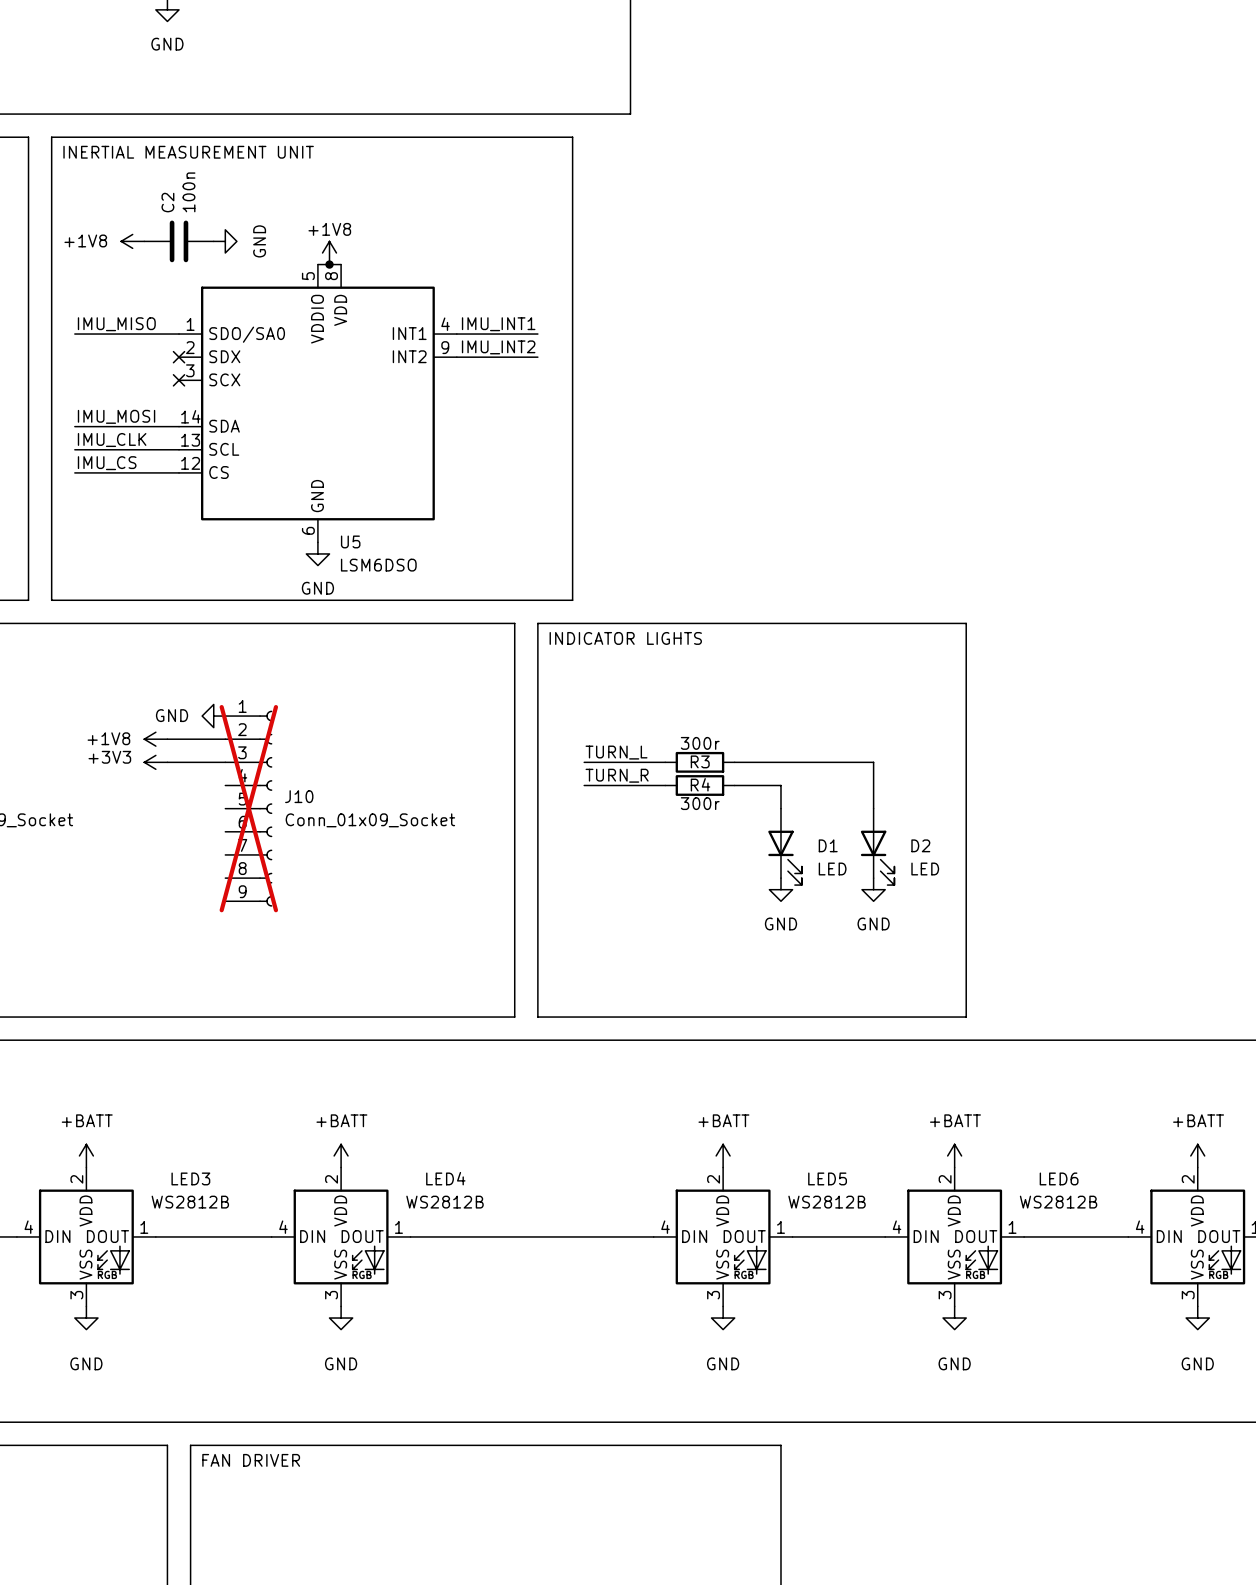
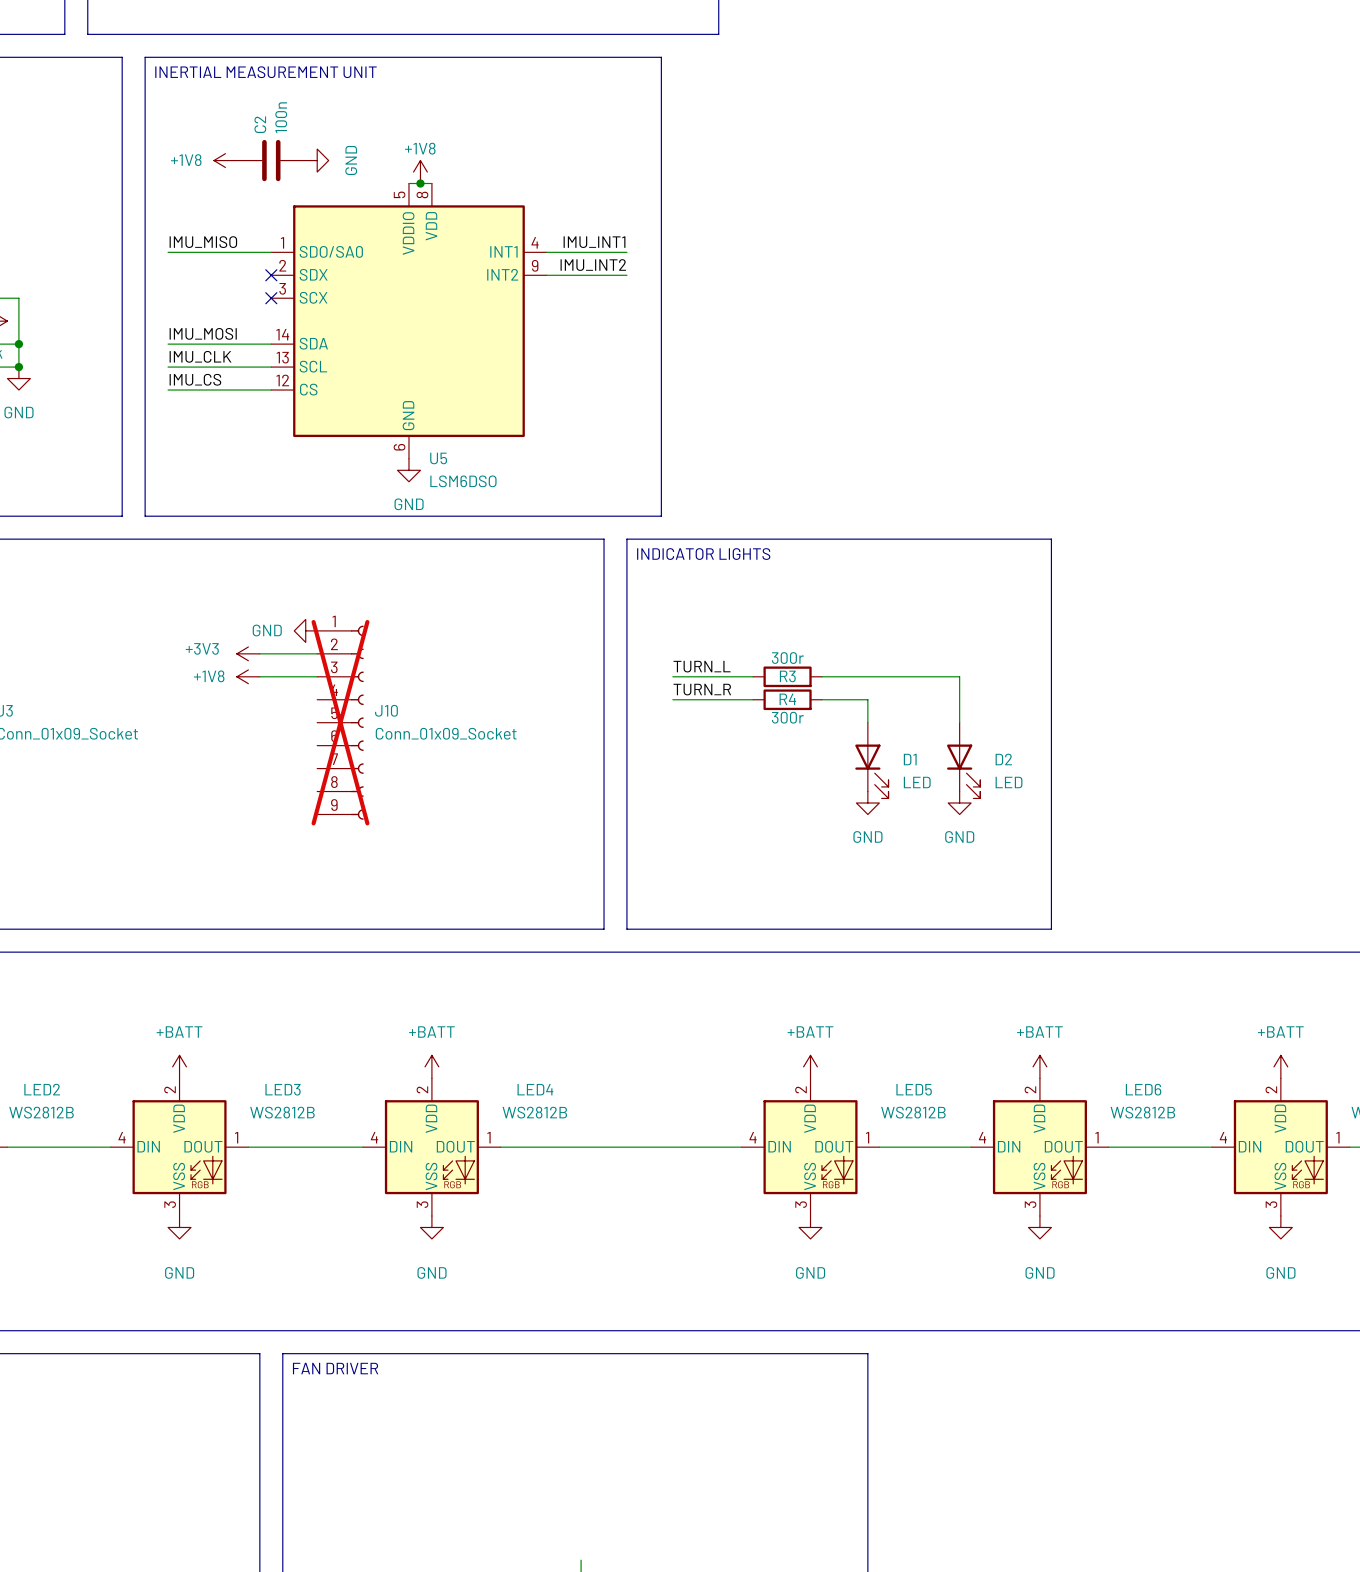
power symbol: +1V8 (155, 739) -> +3V3 (248, 653)
power symbol: +3V3 (155, 762) -> +1V8 (248, 676)

